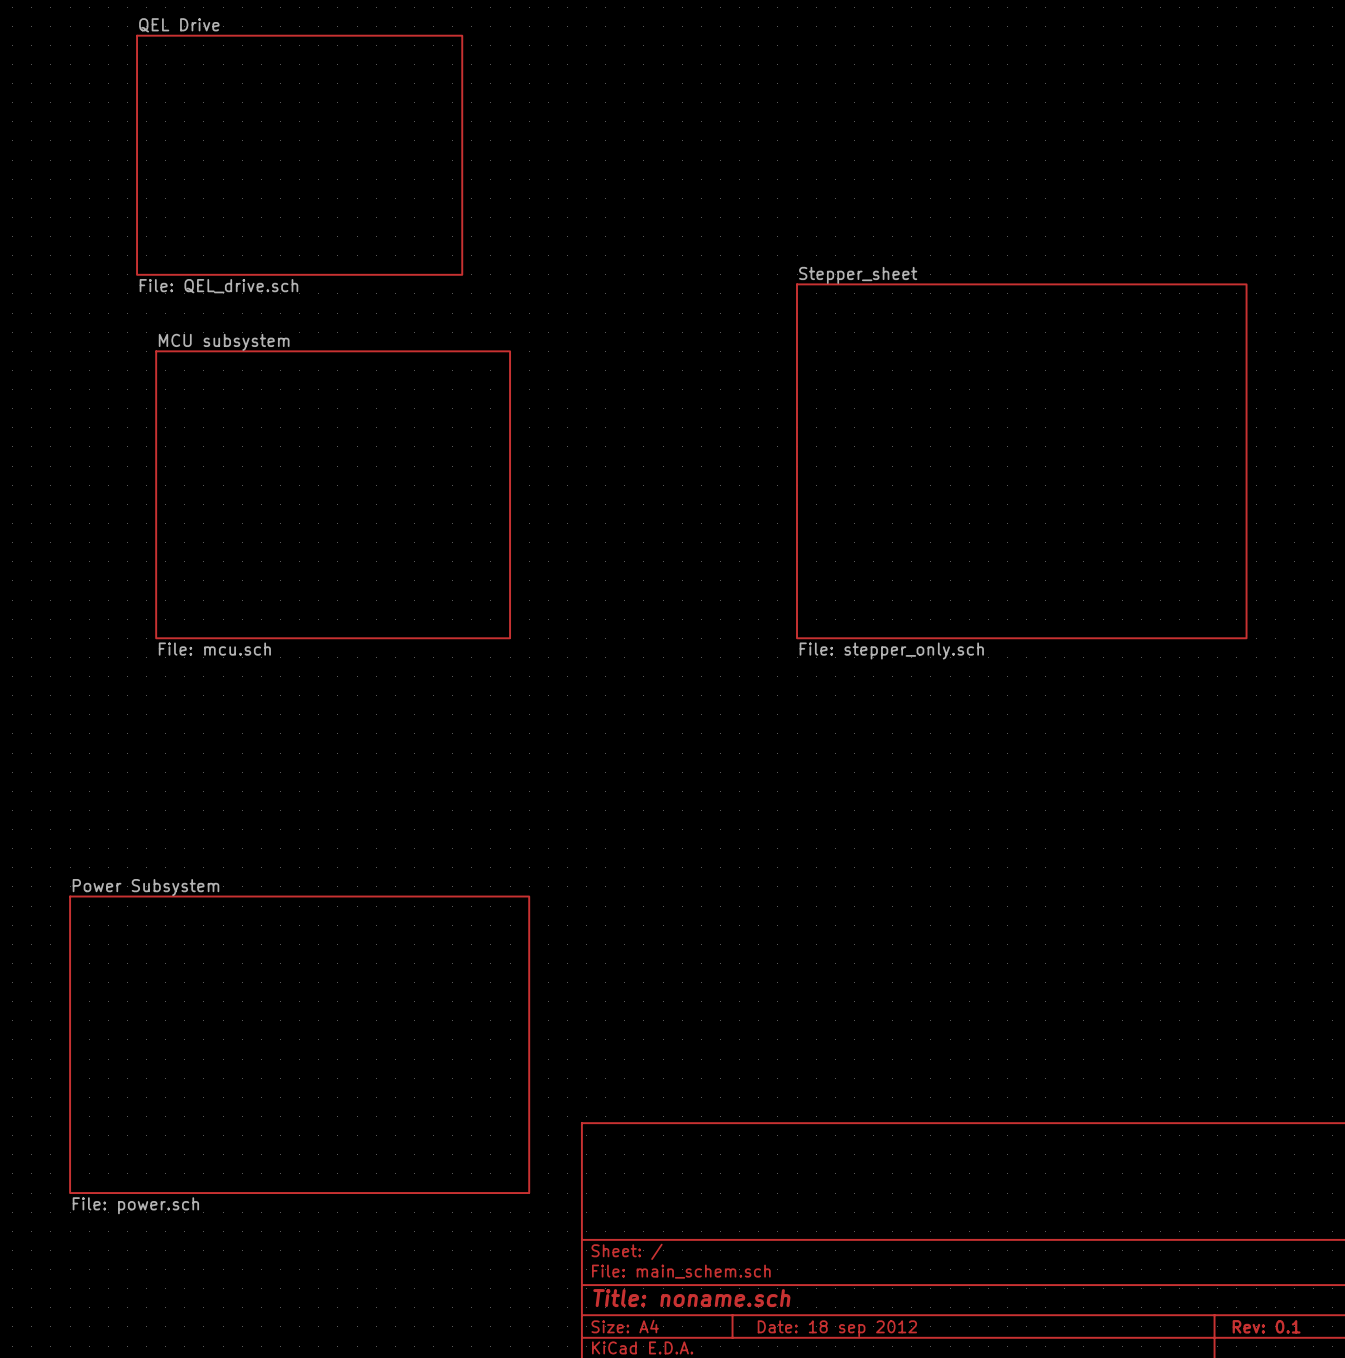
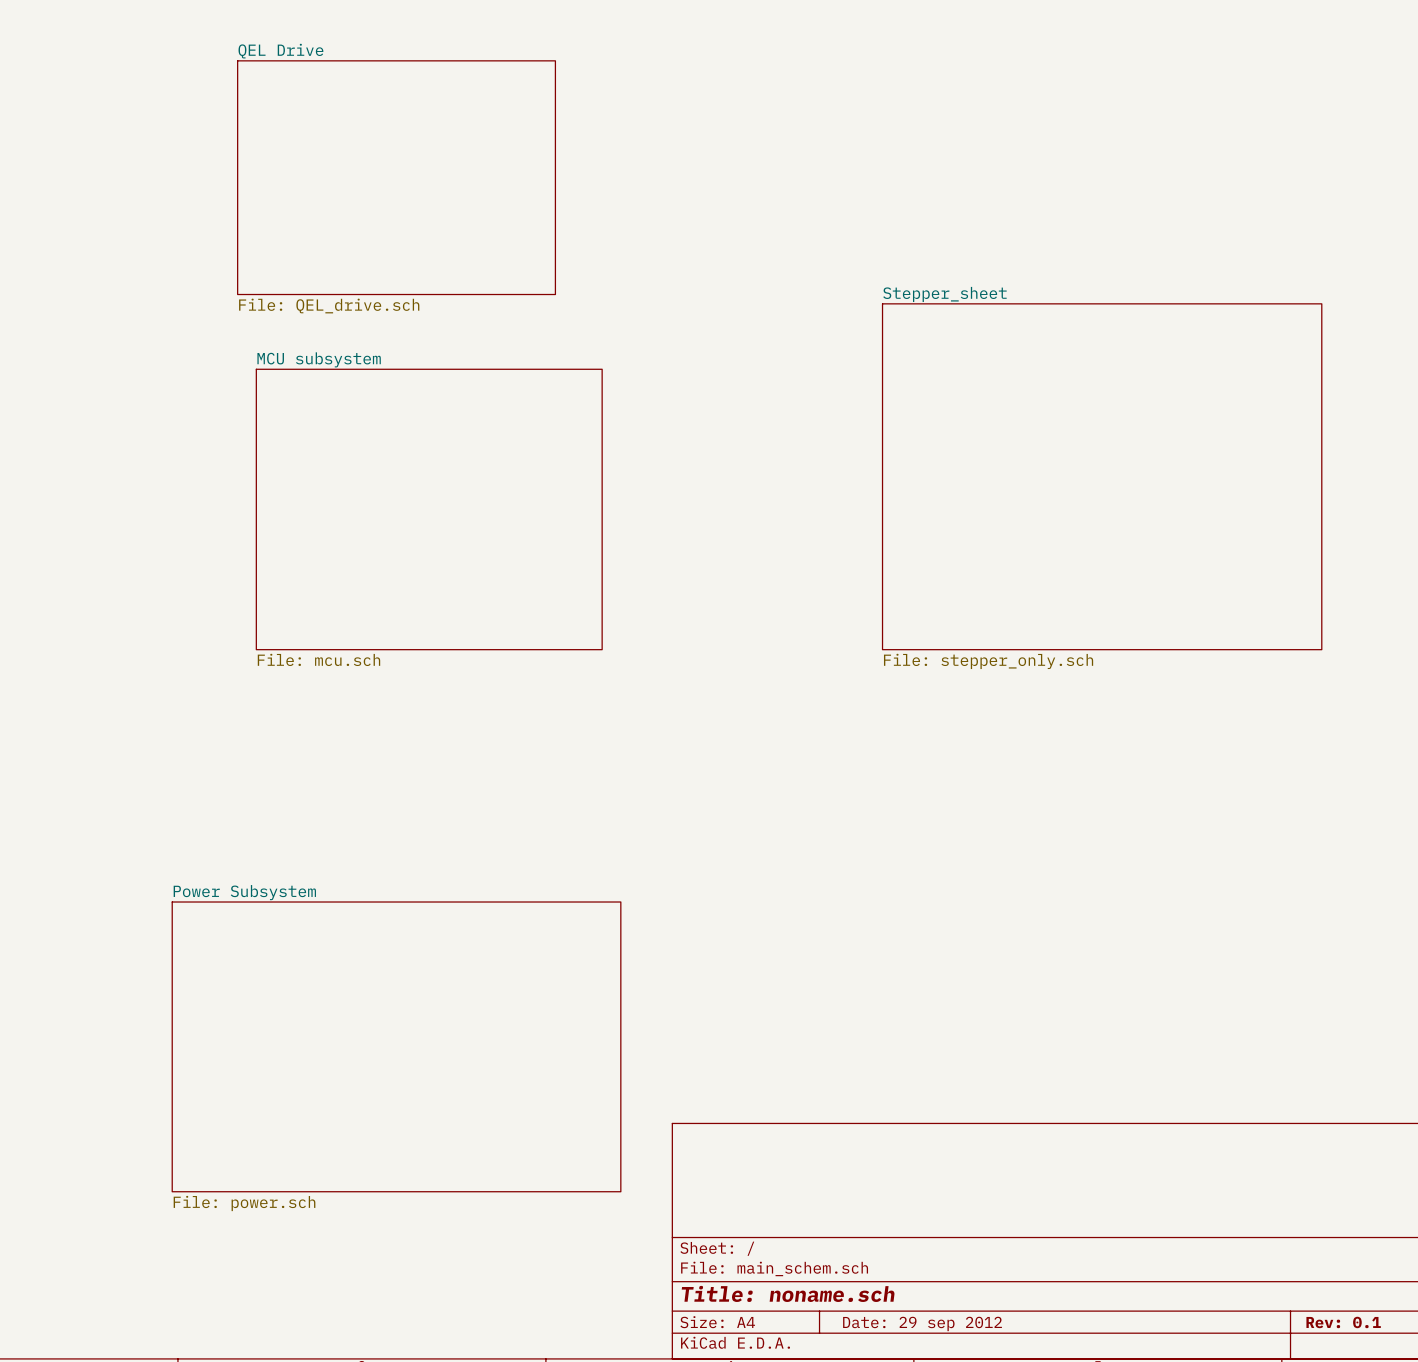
title block: Date: 18 sep 2012 (837, 1328) -> Date: 29 sep 2012 (922, 1323)

